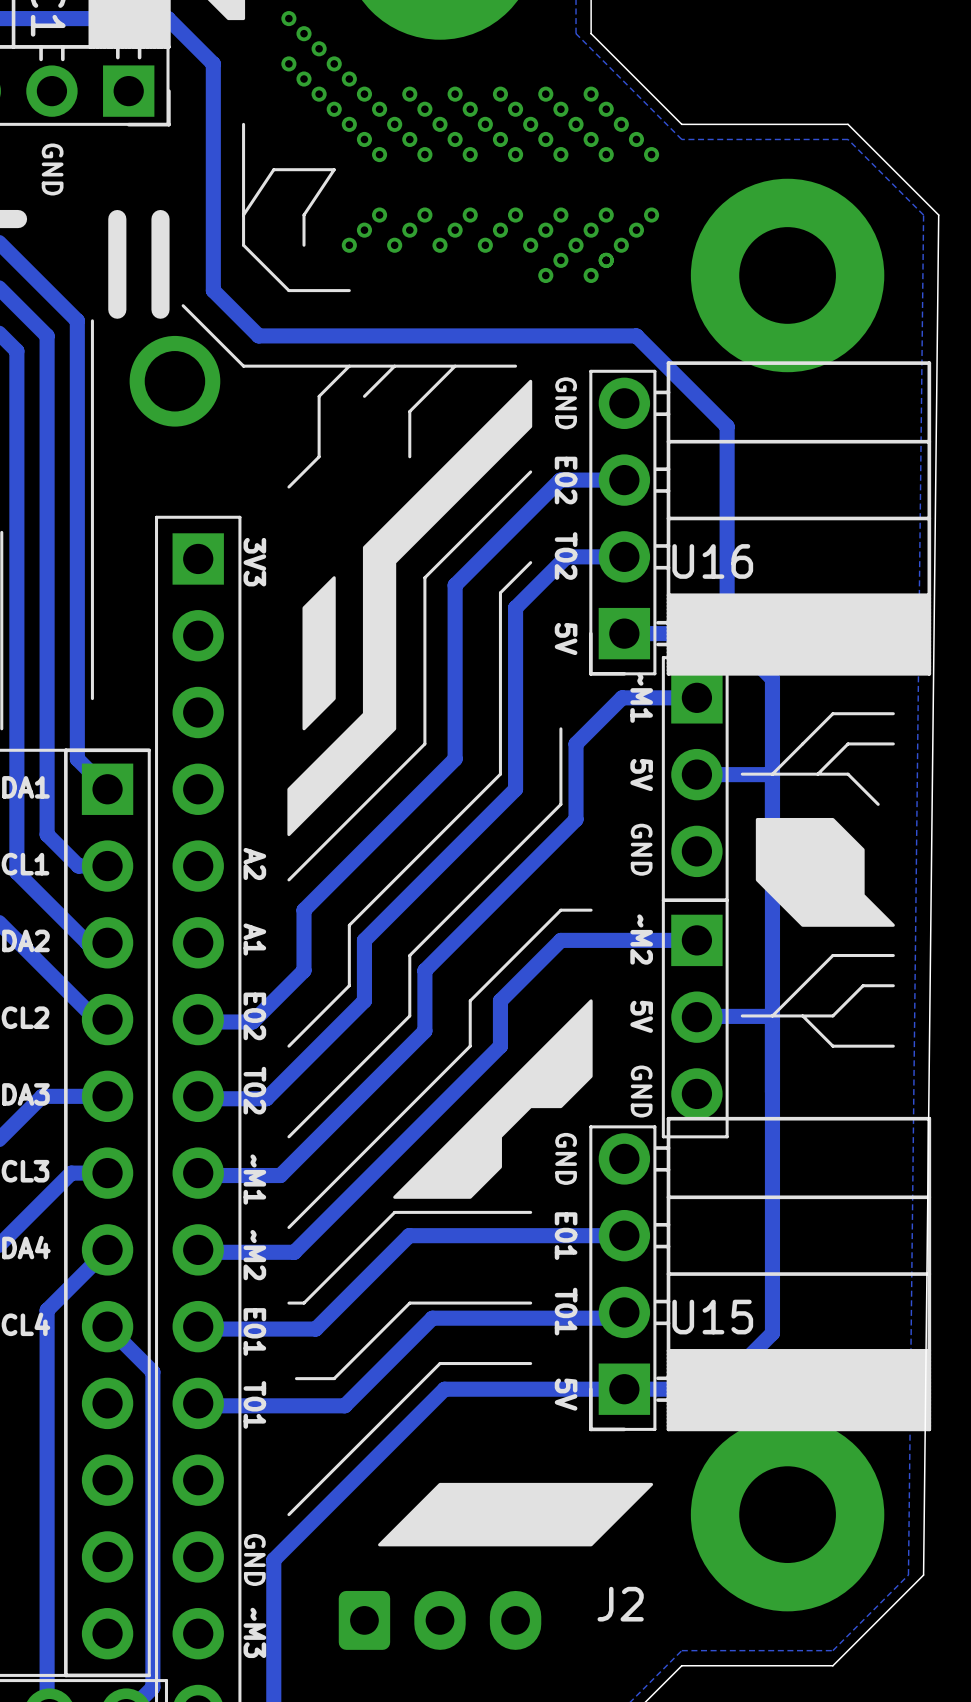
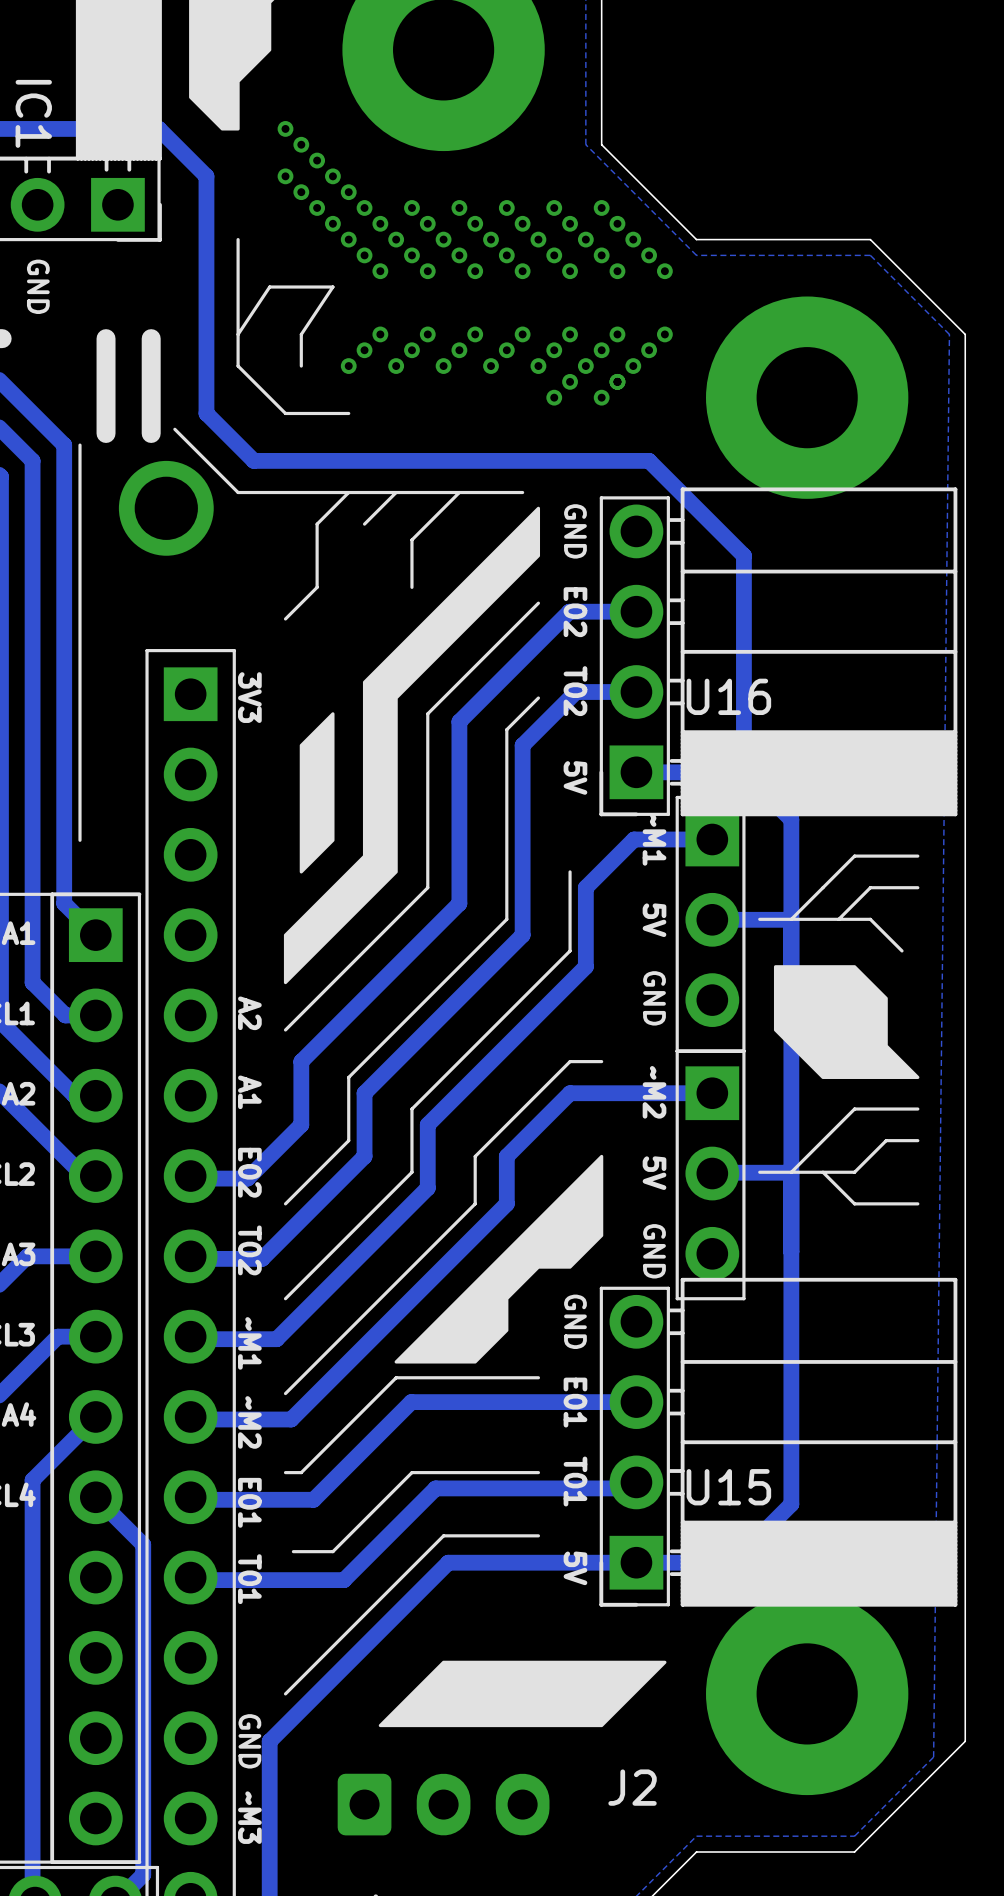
board edge: (938, 215) (923, 1575) -> (965, 334) (965, 1741) (949, 1757)

